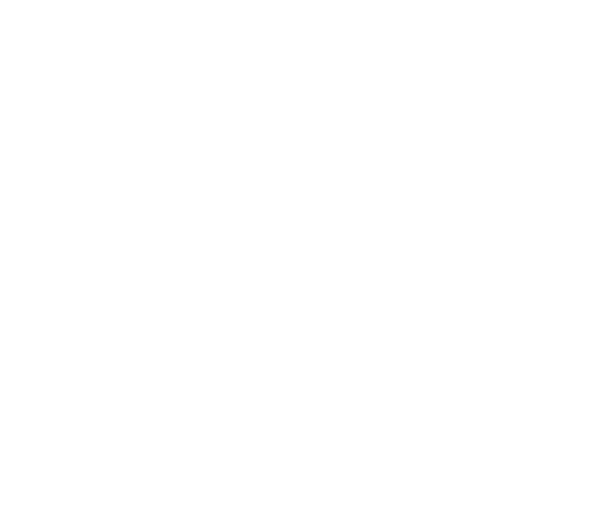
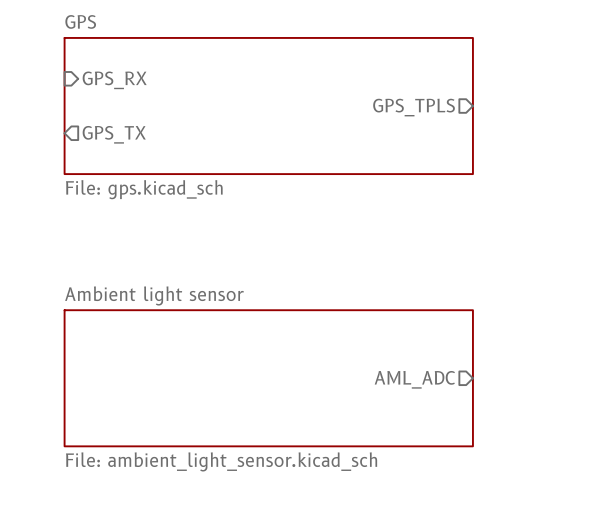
sheet pin: none -> GPS_RX (114, 80)
sheet GPS: none -> File: gps.kicad_sch (268, 106)
sheet pin: none -> GPS_TPLS (414, 107)
sheet pin: none -> GPS_TX (114, 134)
sheet Ambient light sensor: none -> File: ambient_light_sensor.kicad_sch (268, 378)
sheet pin: none -> AML_ADC (414, 379)

